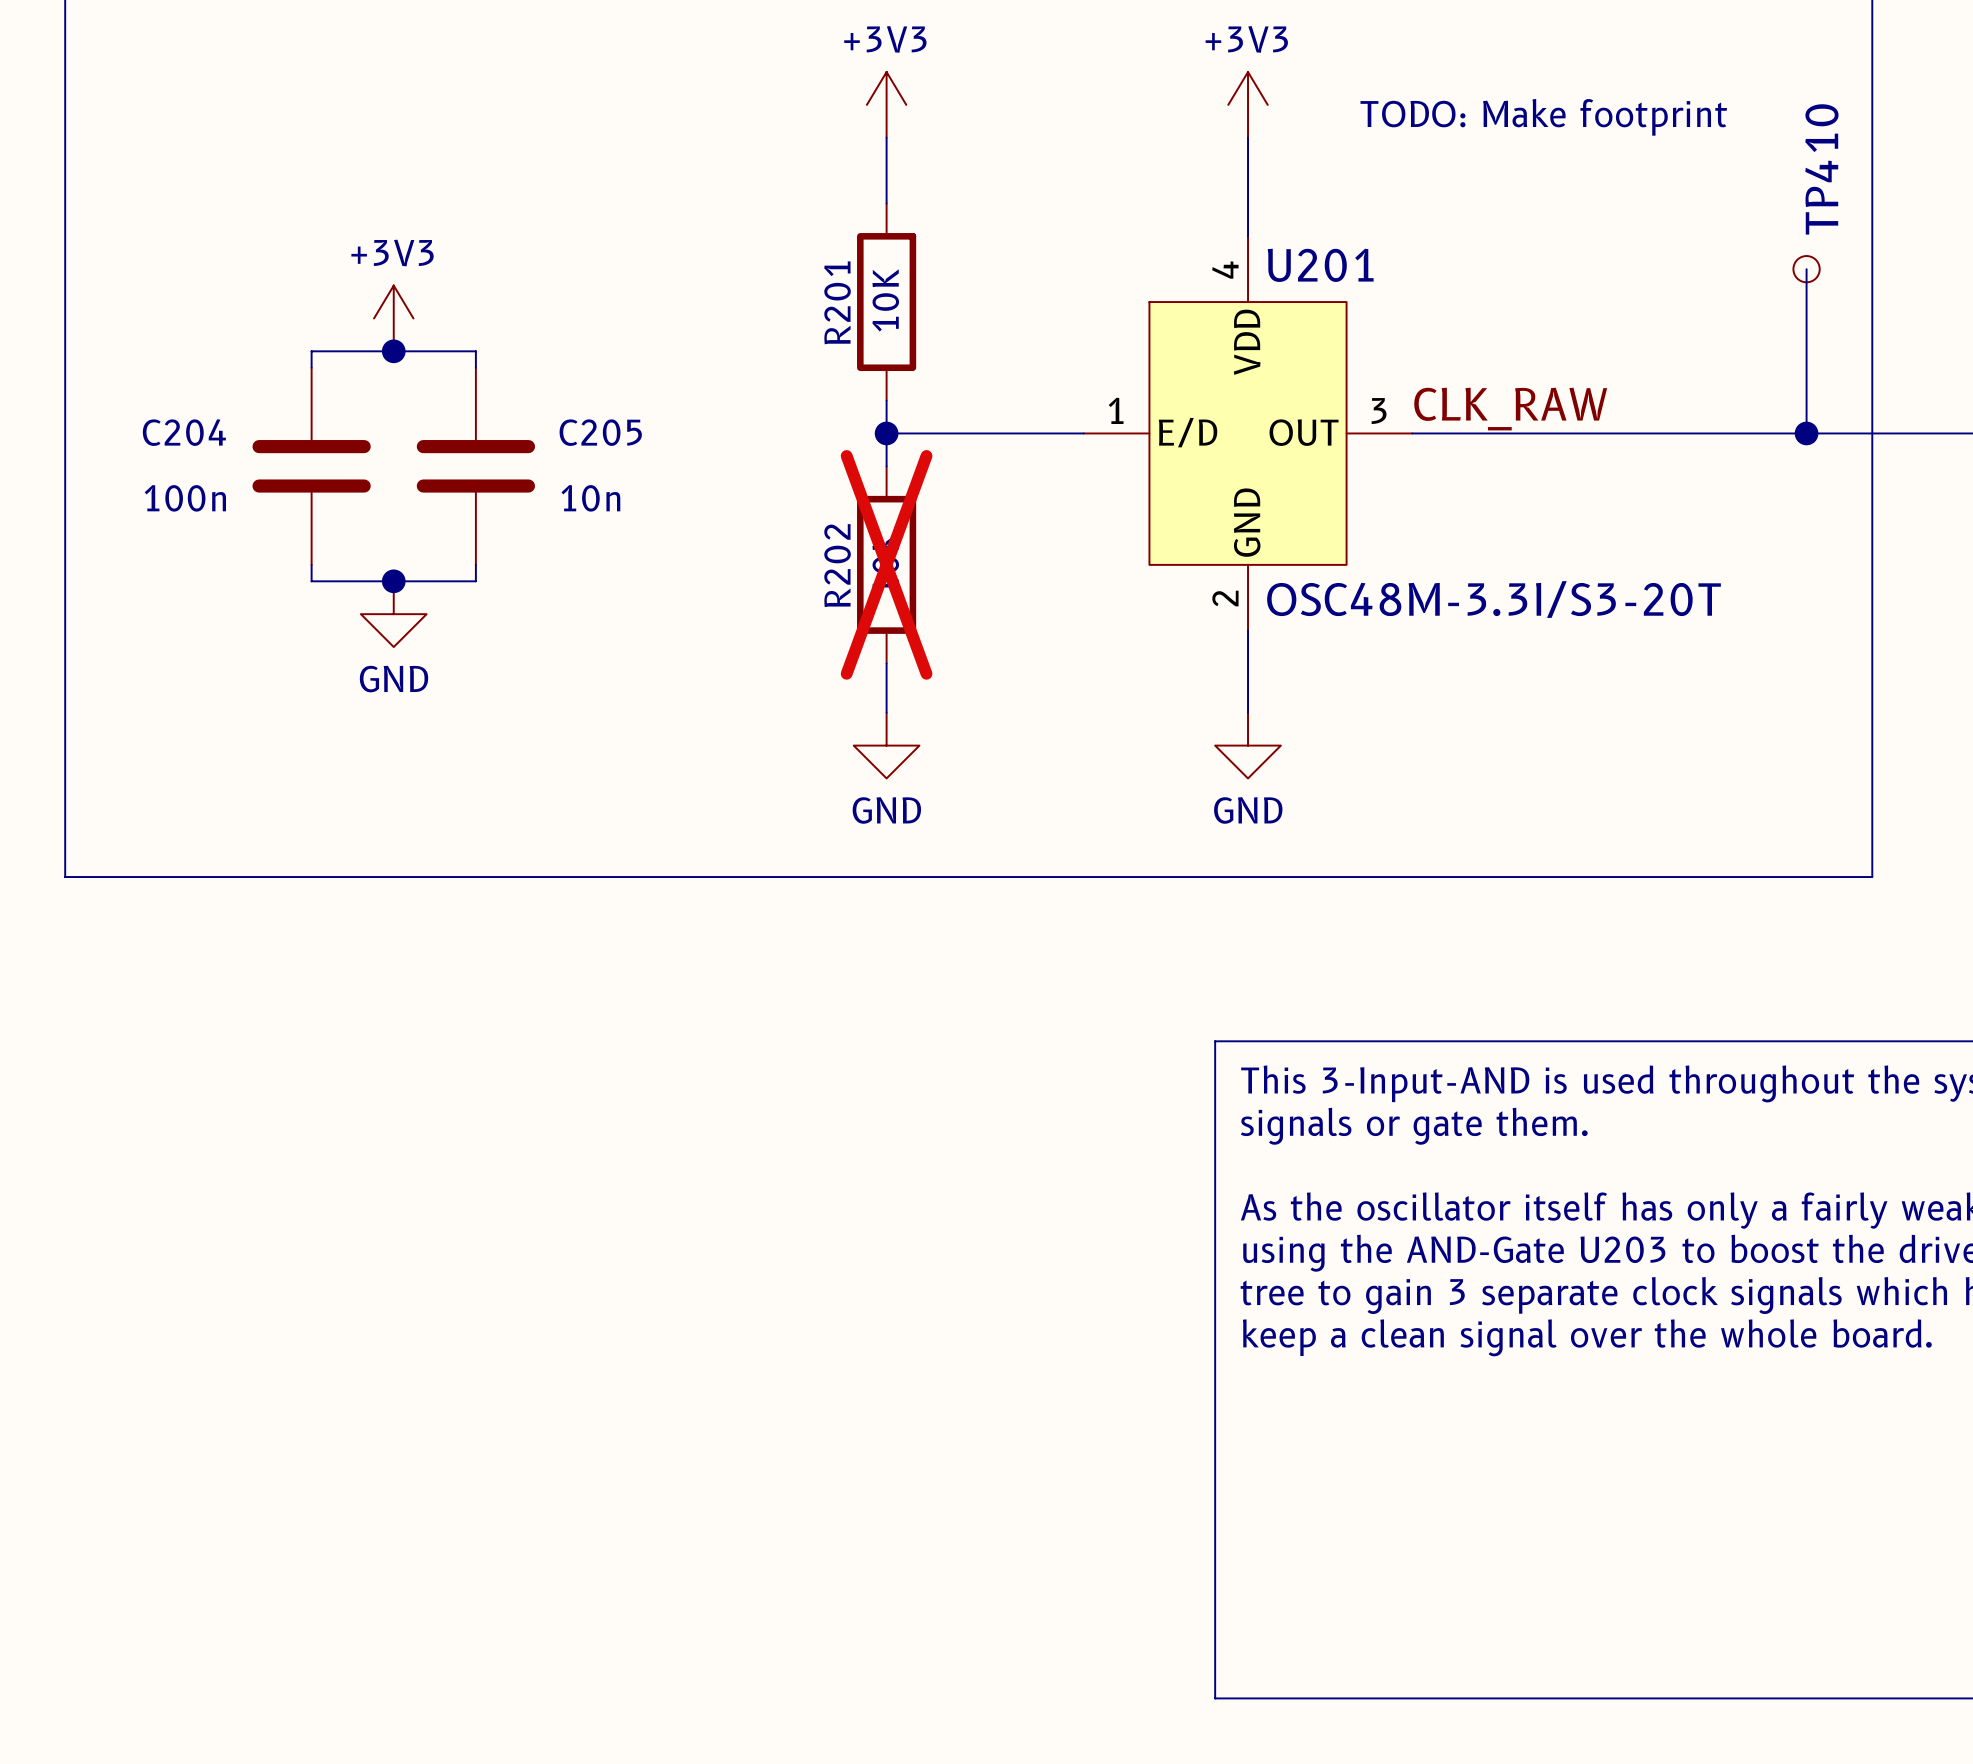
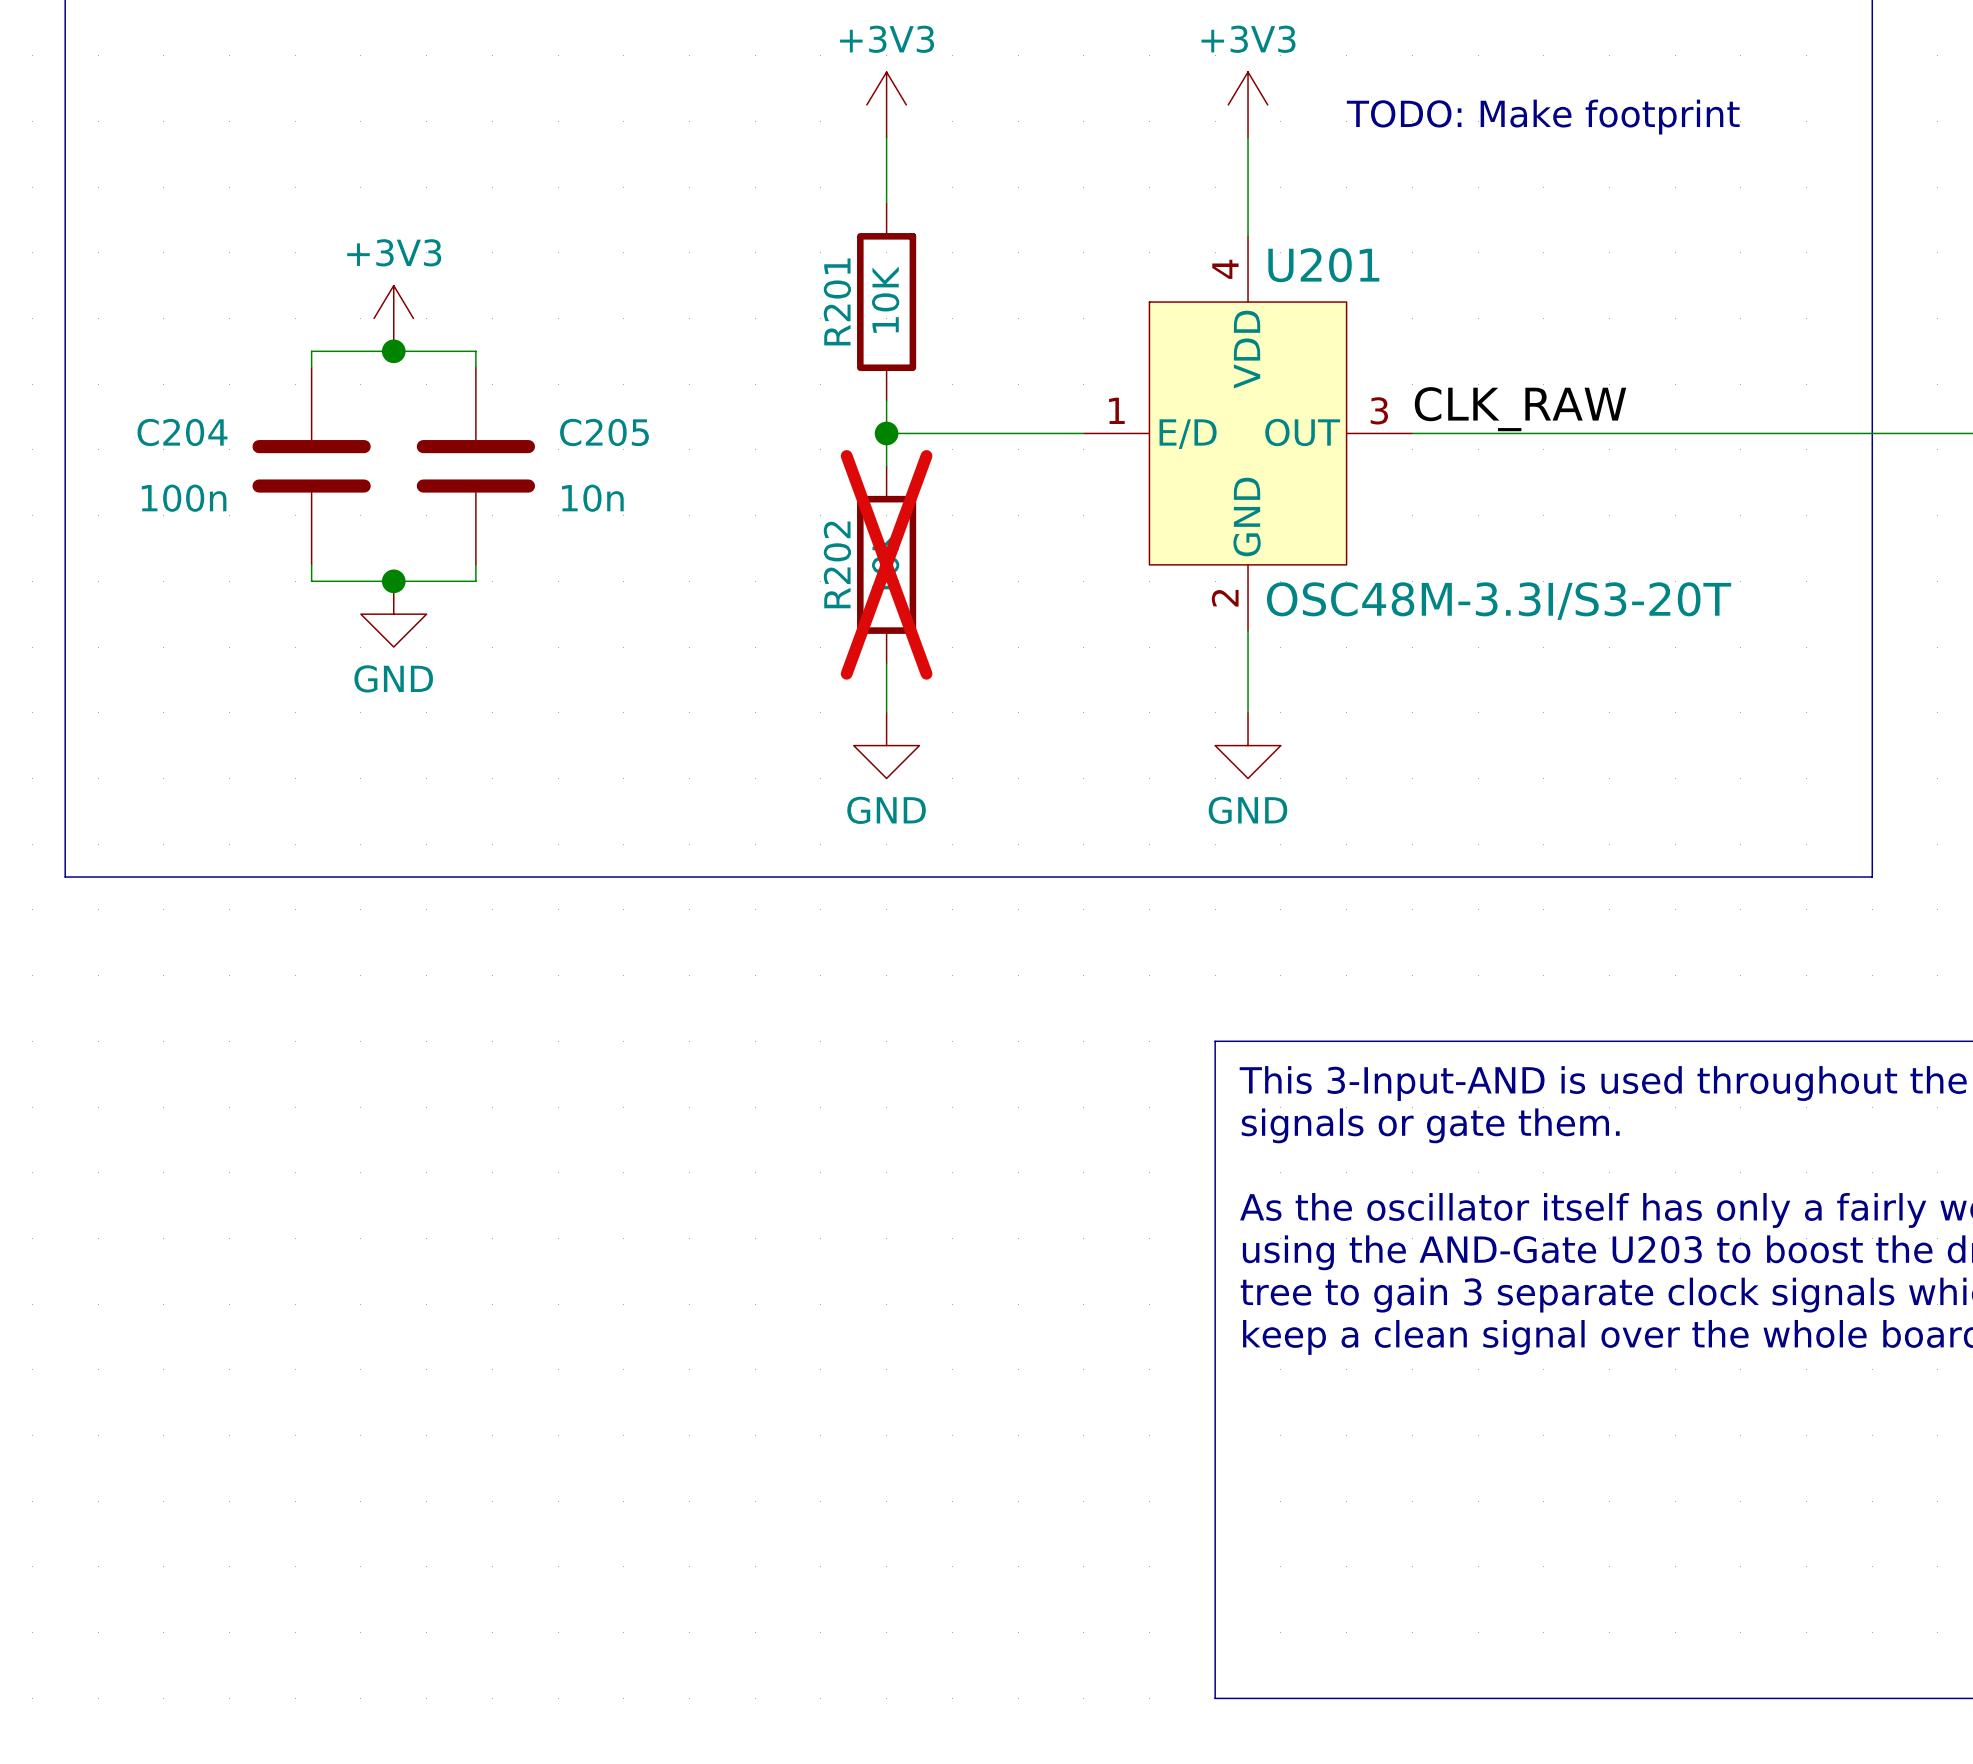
wire: (1806, 269) (1806, 433) -> none
TP410: (1806, 269) -> none
junction: (1806, 433) -> none

